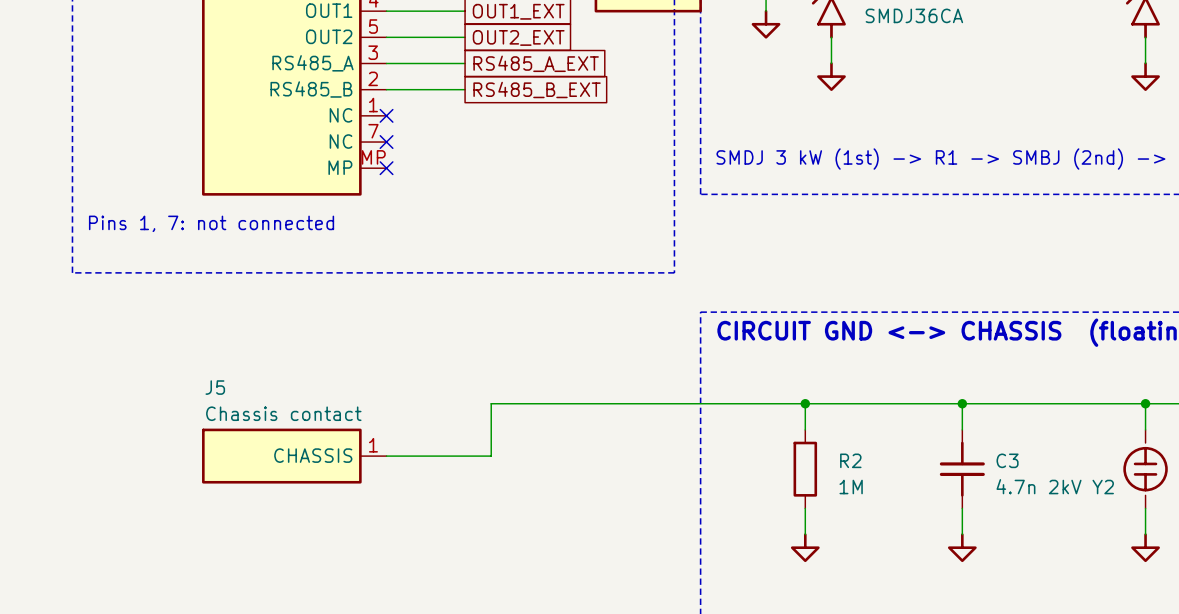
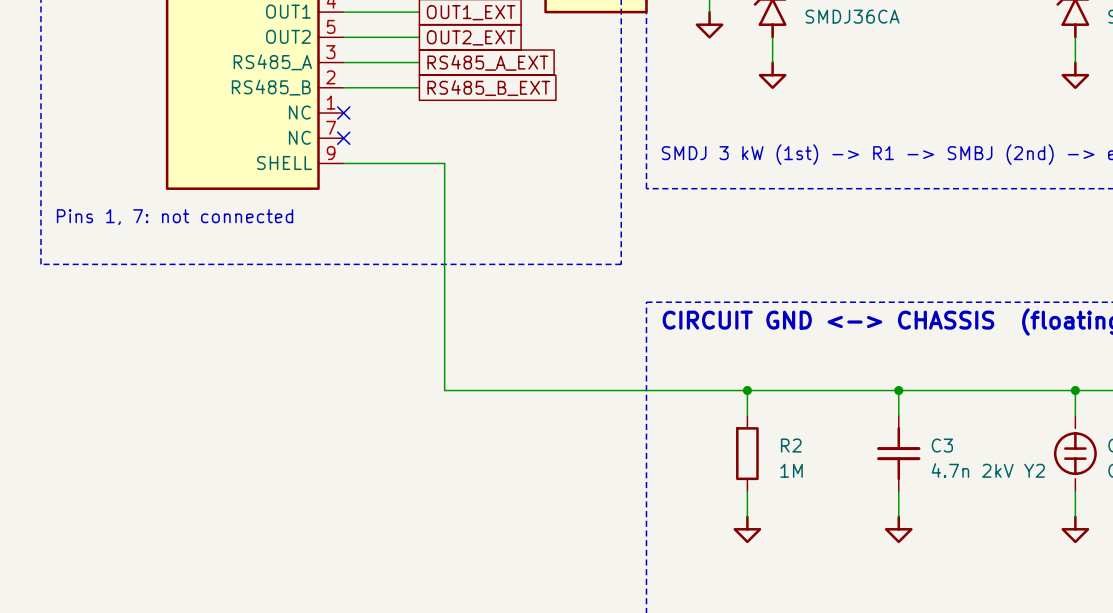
part pin number: MP (373, 157) -> 9 (331, 153)
part pin name: MP (340, 167) -> SHELL (284, 162)
no-connect mark: (386, 168) -> none
wire: (491, 403) (491, 456) (386, 456) -> (444, 390) (444, 163) (343, 163)
J5: Chassis contact (294, 456) -> none

